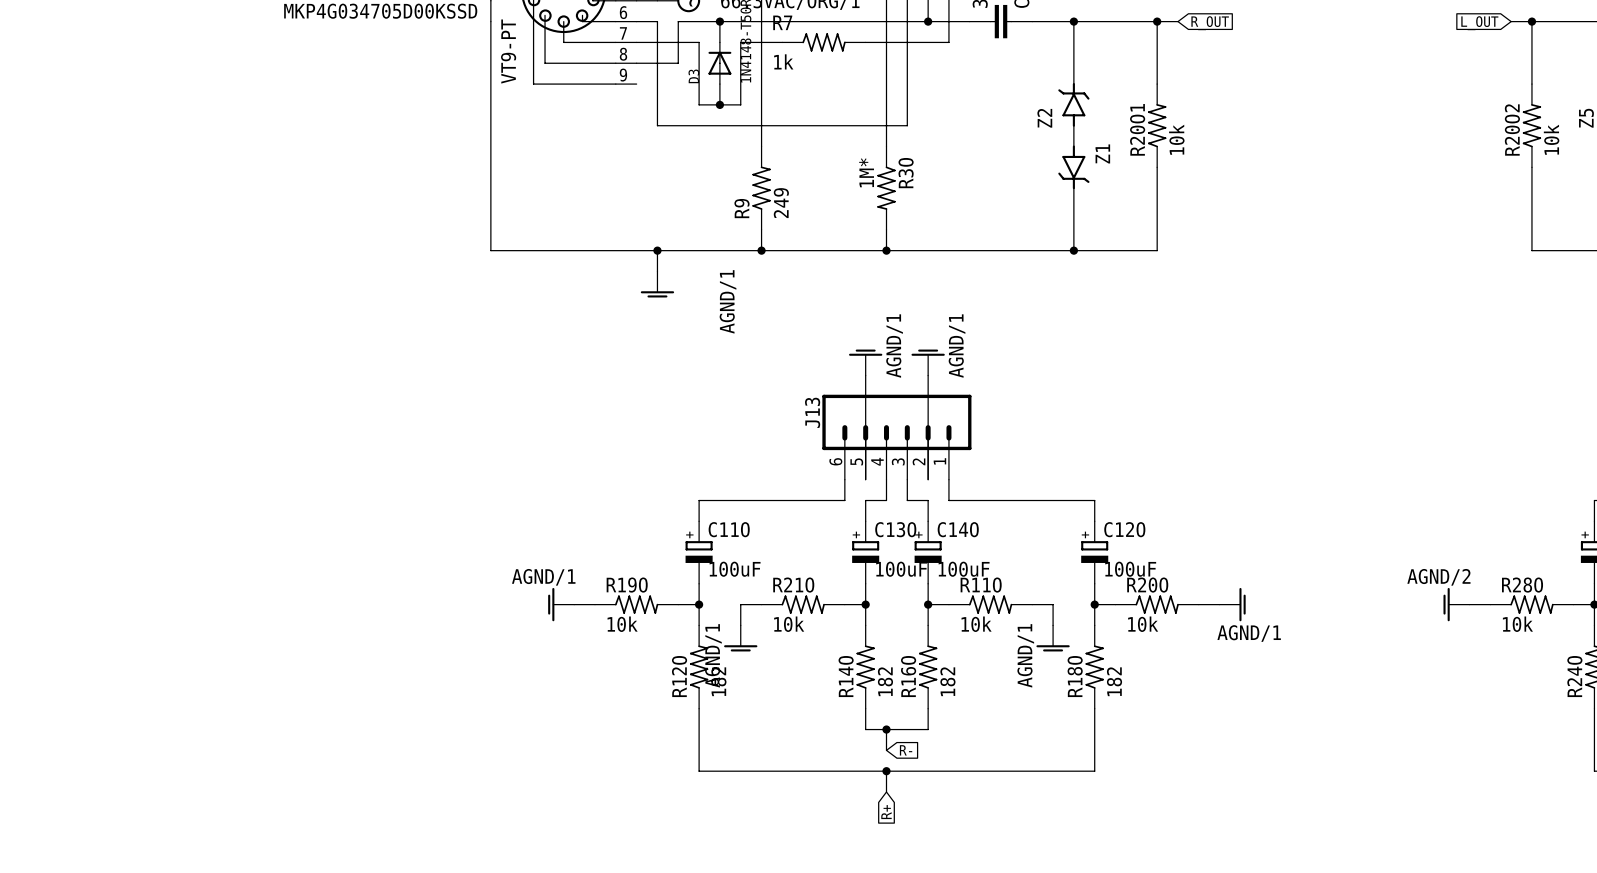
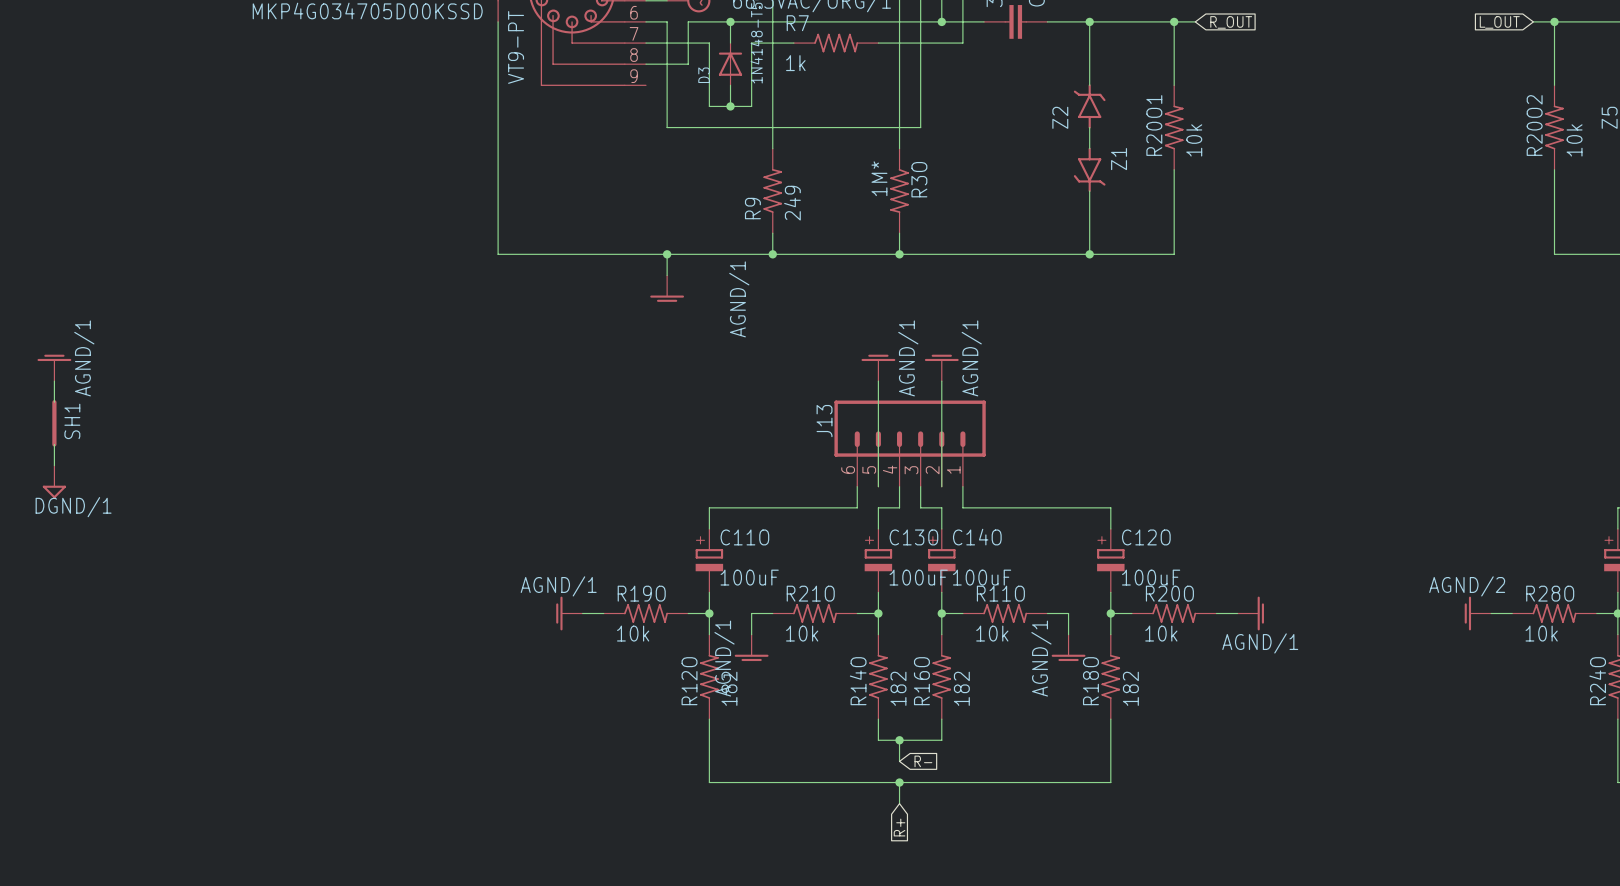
power symbol: none -> AGND/1 (54, 367)
wire: none -> (54, 381) (54, 402)
SH1: none -> (54, 423)
wire: none -> (54, 444) (54, 465)
power symbol: none -> DGND/1 (54, 481)

